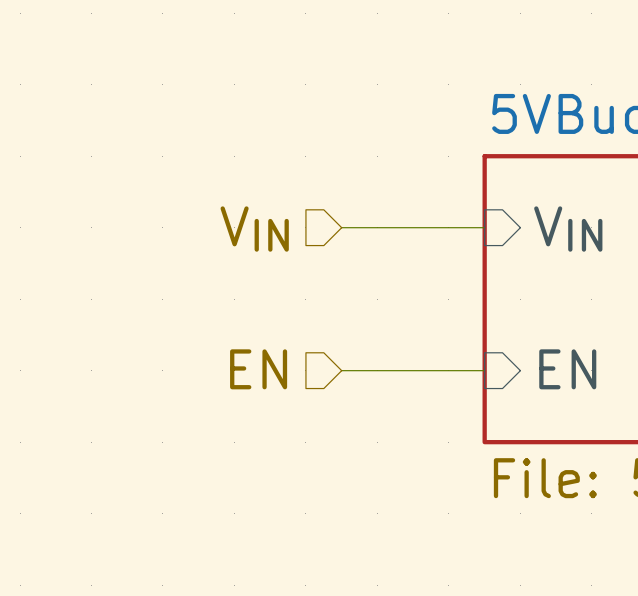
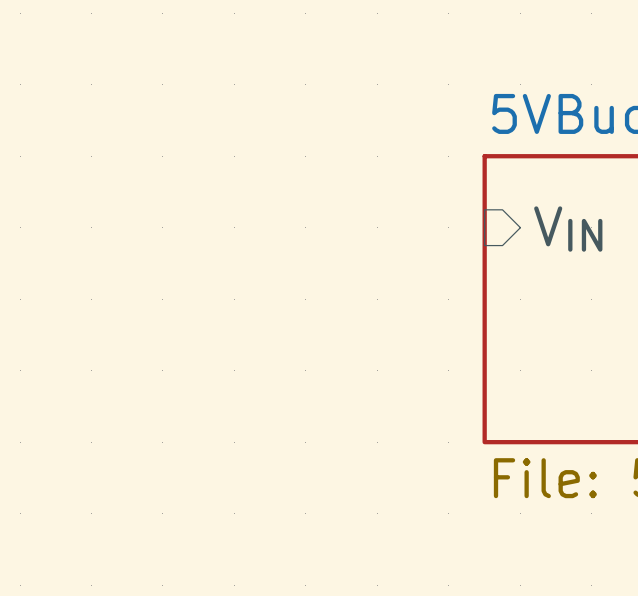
wire: (341, 227) (484, 227) -> none
hierarchical label: VIN (254, 229) -> none
hierarchical label: EN (258, 369) -> none
sheet pin: EN (567, 369) -> none
wire: (341, 370) (484, 370) -> none

